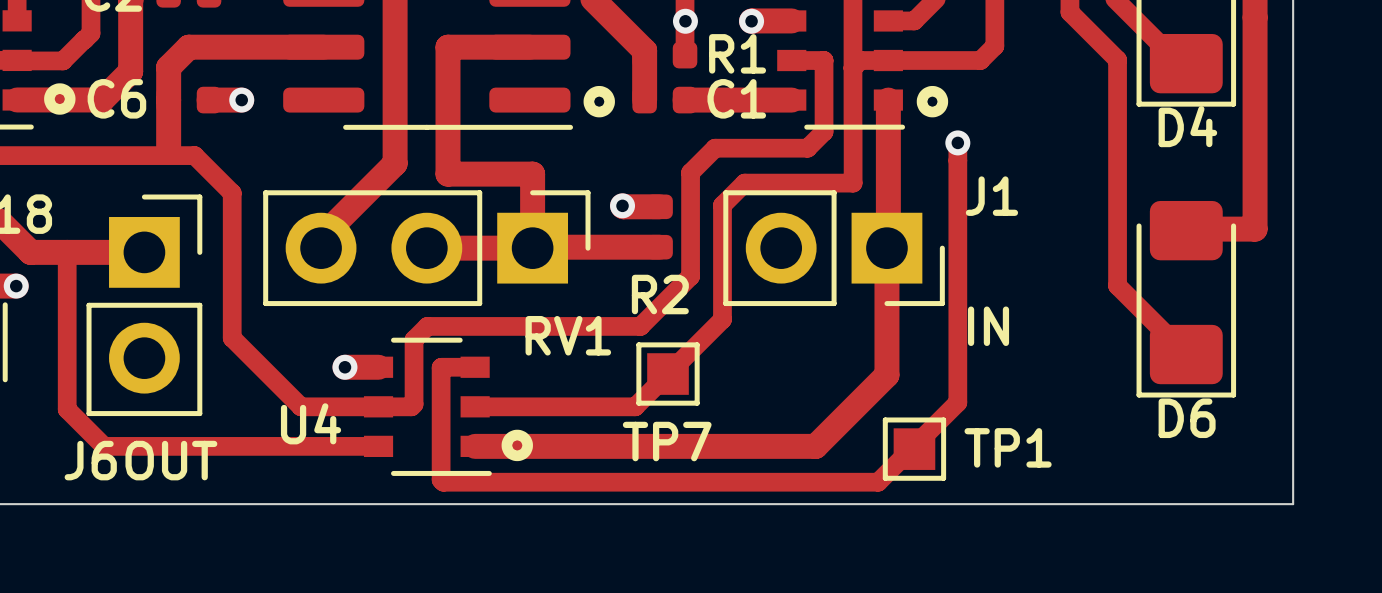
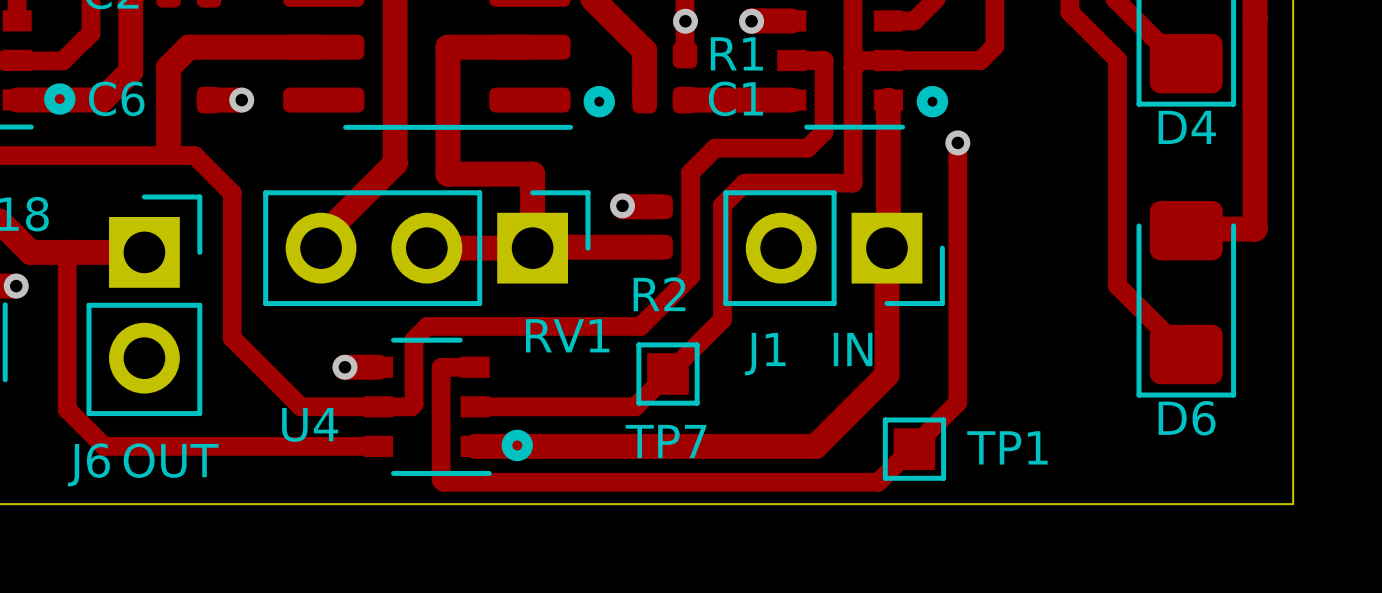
J1 name position: J1 (991, 196) -> J1 (765, 354)
text position: IN (988, 326) -> IN (853, 349)

